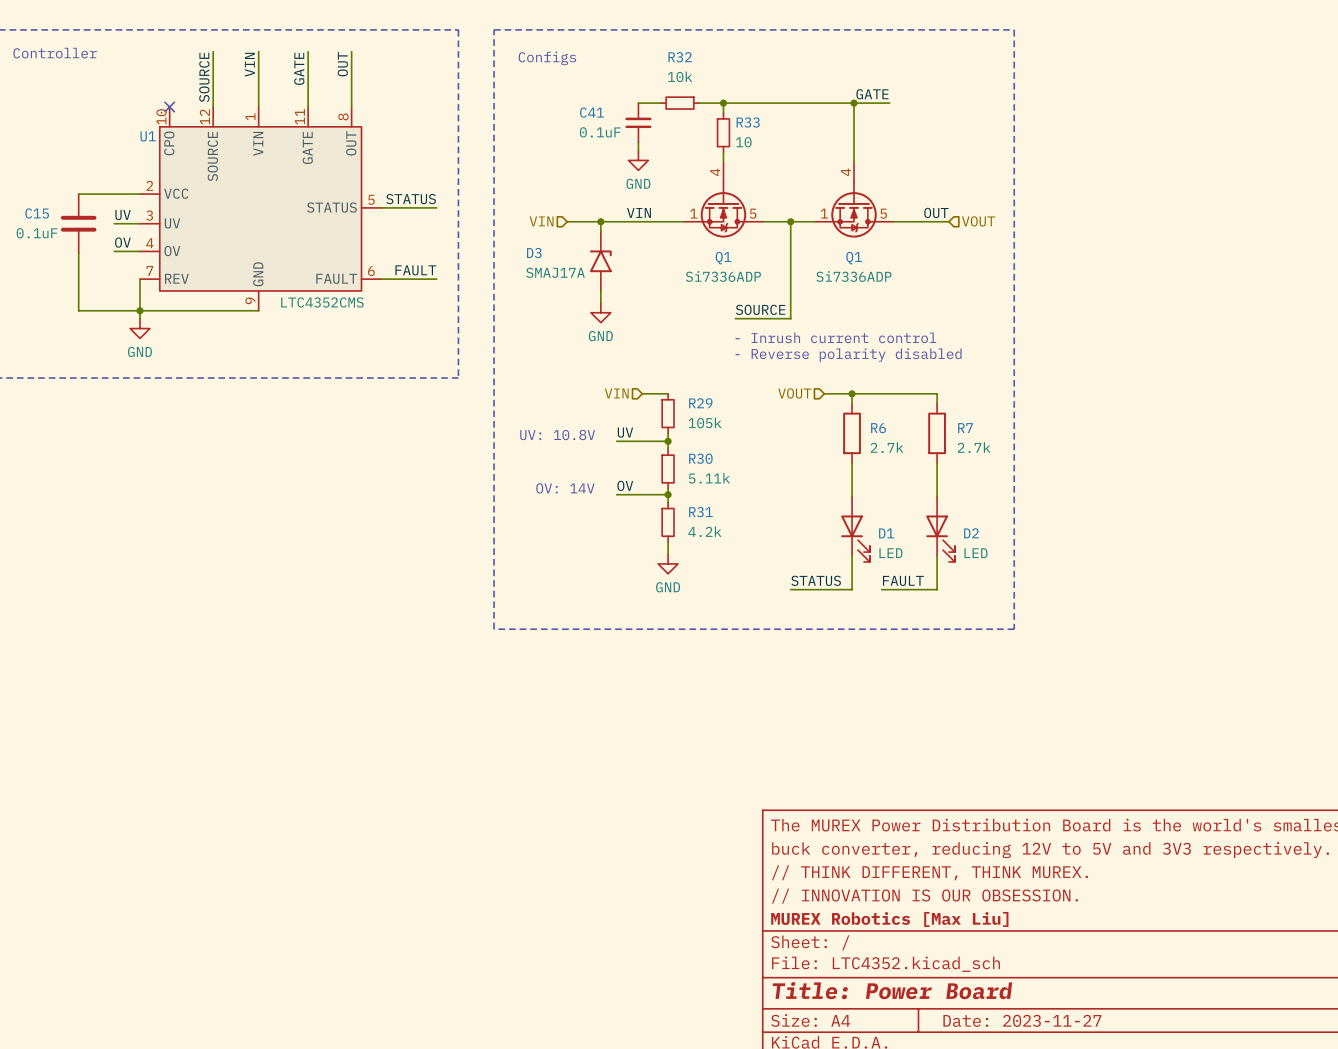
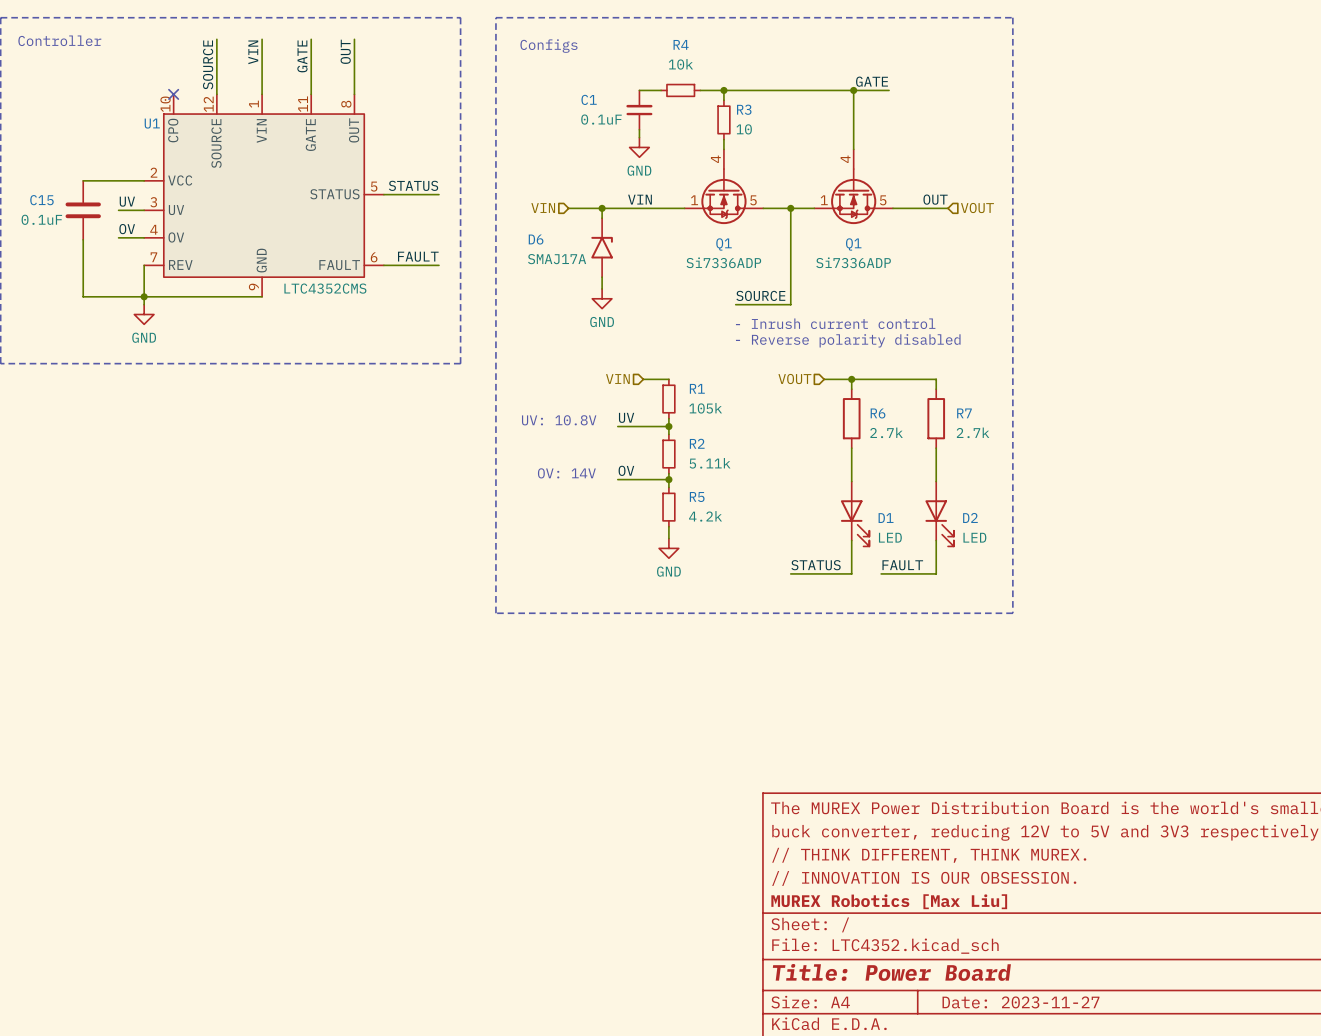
R32 name: R32 (680, 57) -> R4 (681, 44)
C41 name: C41 (592, 112) -> C1 (589, 99)
R33 name: R33 (748, 122) -> R3 (744, 109)
D3 name: D3 (534, 253) -> D6 (536, 239)
R29 name: R29 (700, 403) -> R1 (697, 388)
R30 name: R30 (700, 458) -> R2 (697, 443)
R31 name: R31 (700, 512) -> R5 (697, 497)

